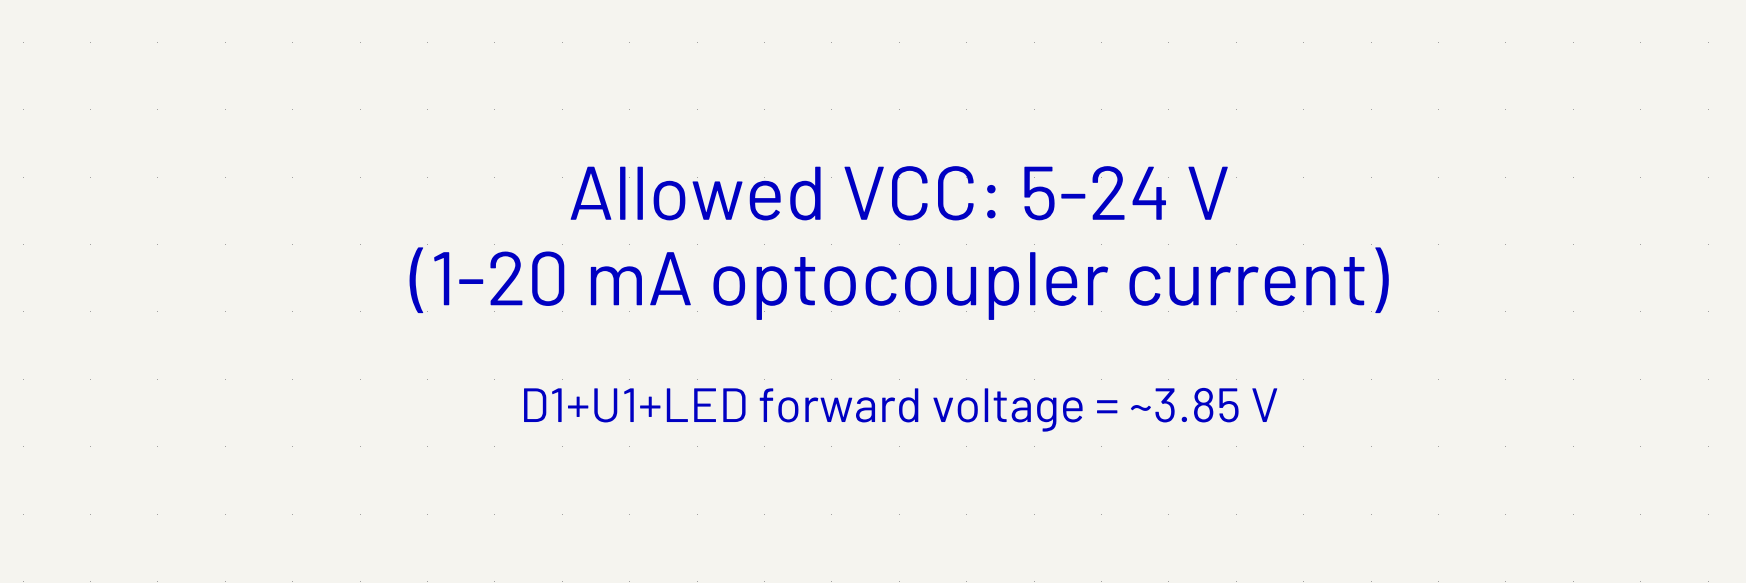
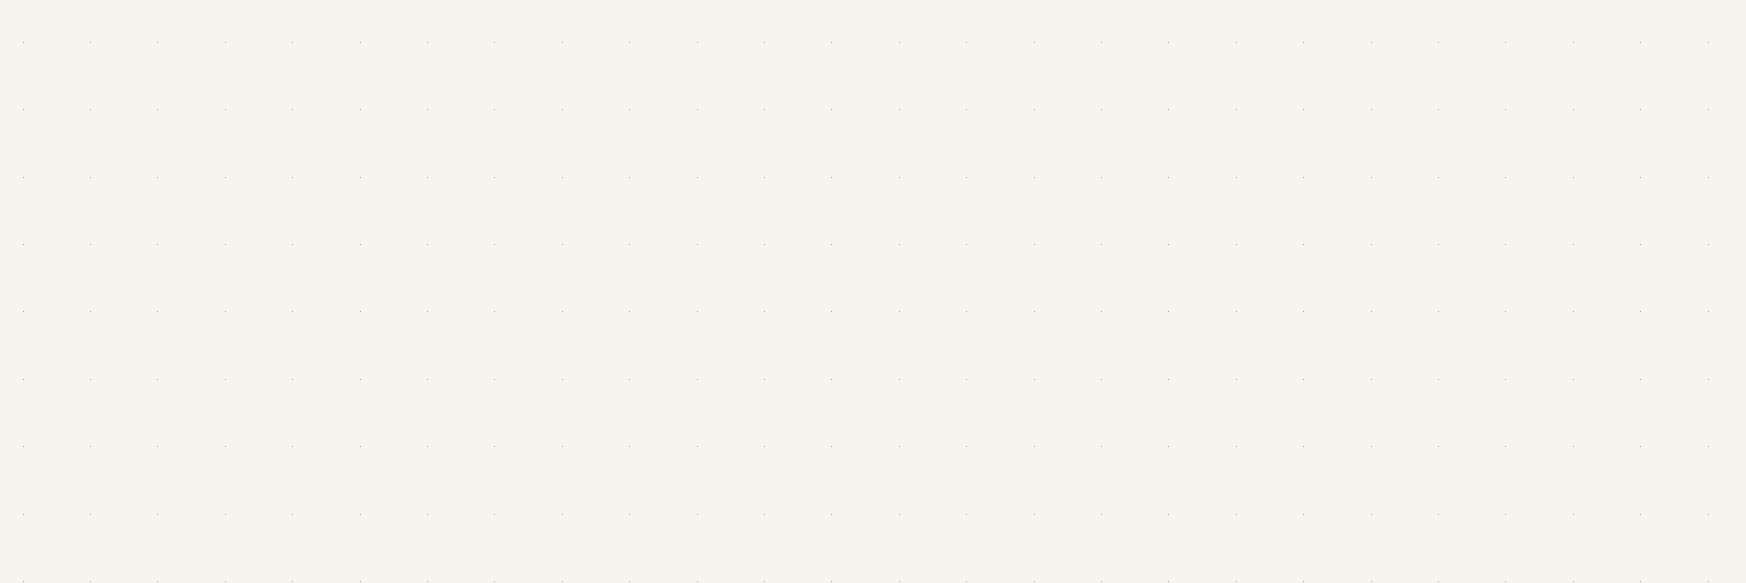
text: Allowed VCC: 5-24 V (899, 193) -> none
text: (1-20 mA optocoupler current) (899, 283) -> none
text: D1+U1+LED forward voltage = ~3.85 V (900, 409) -> none

